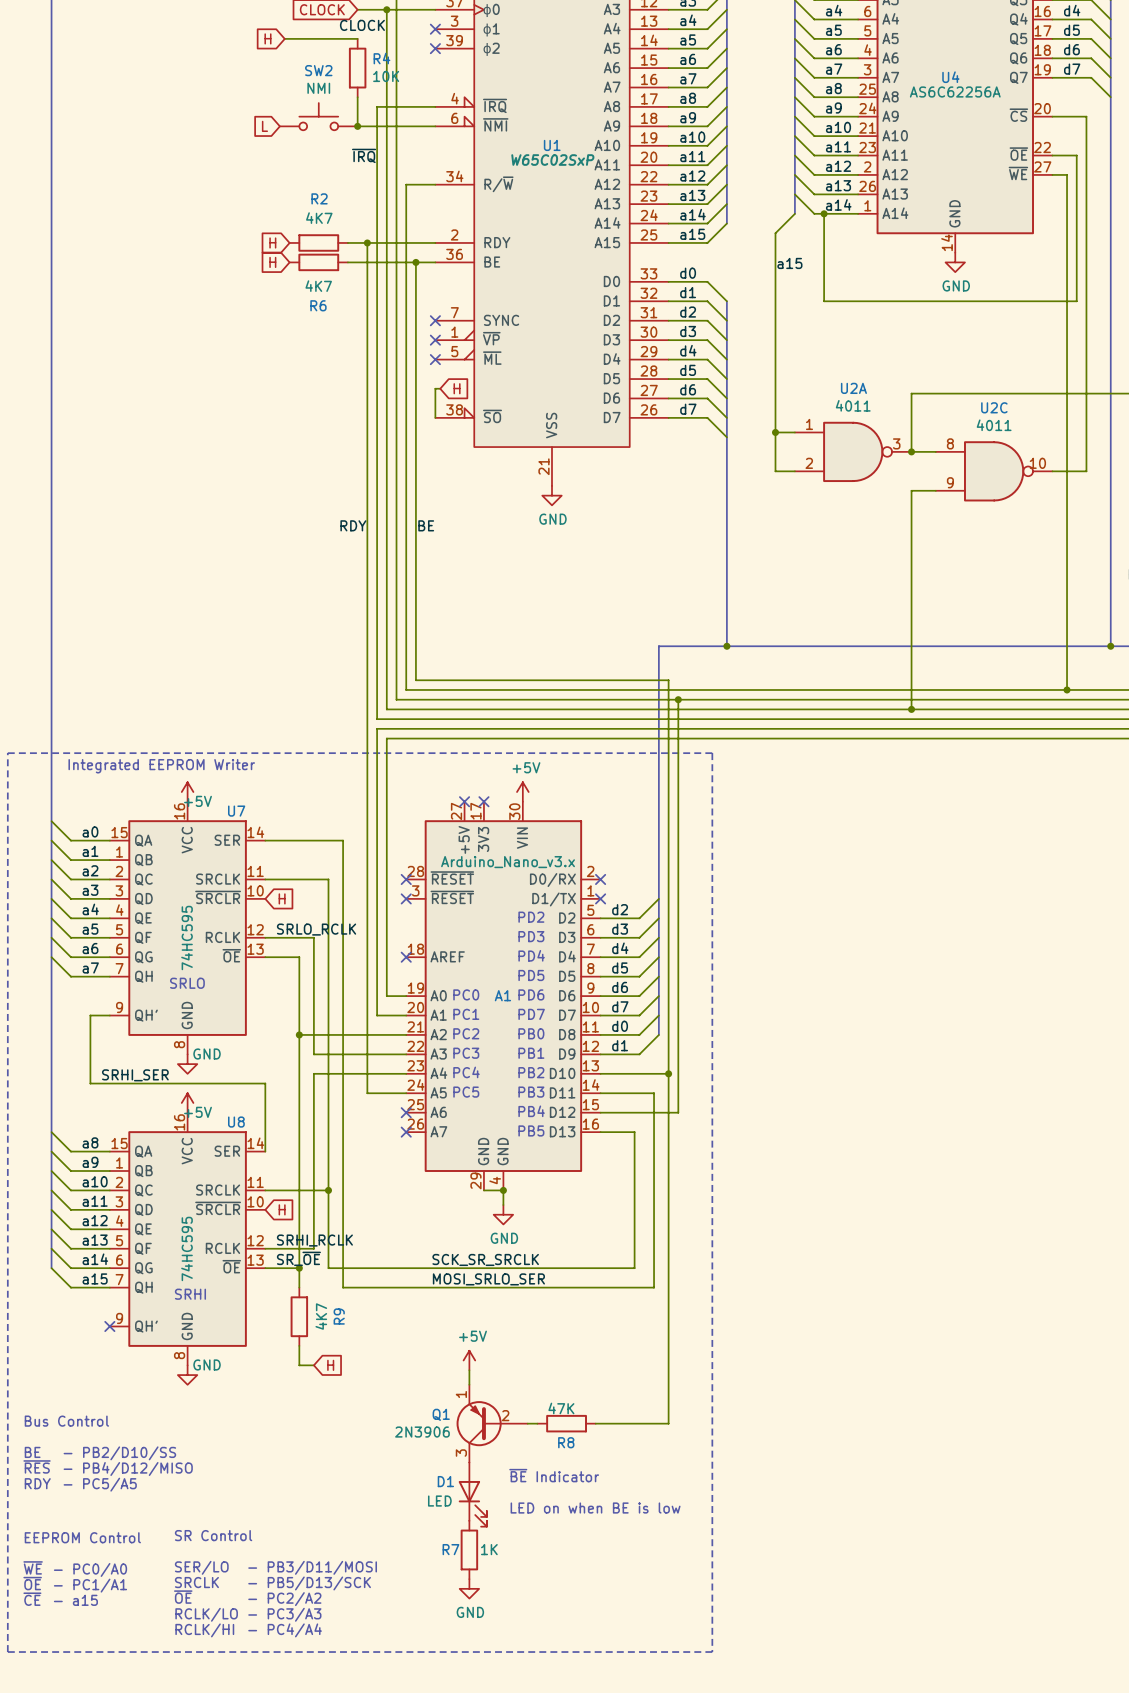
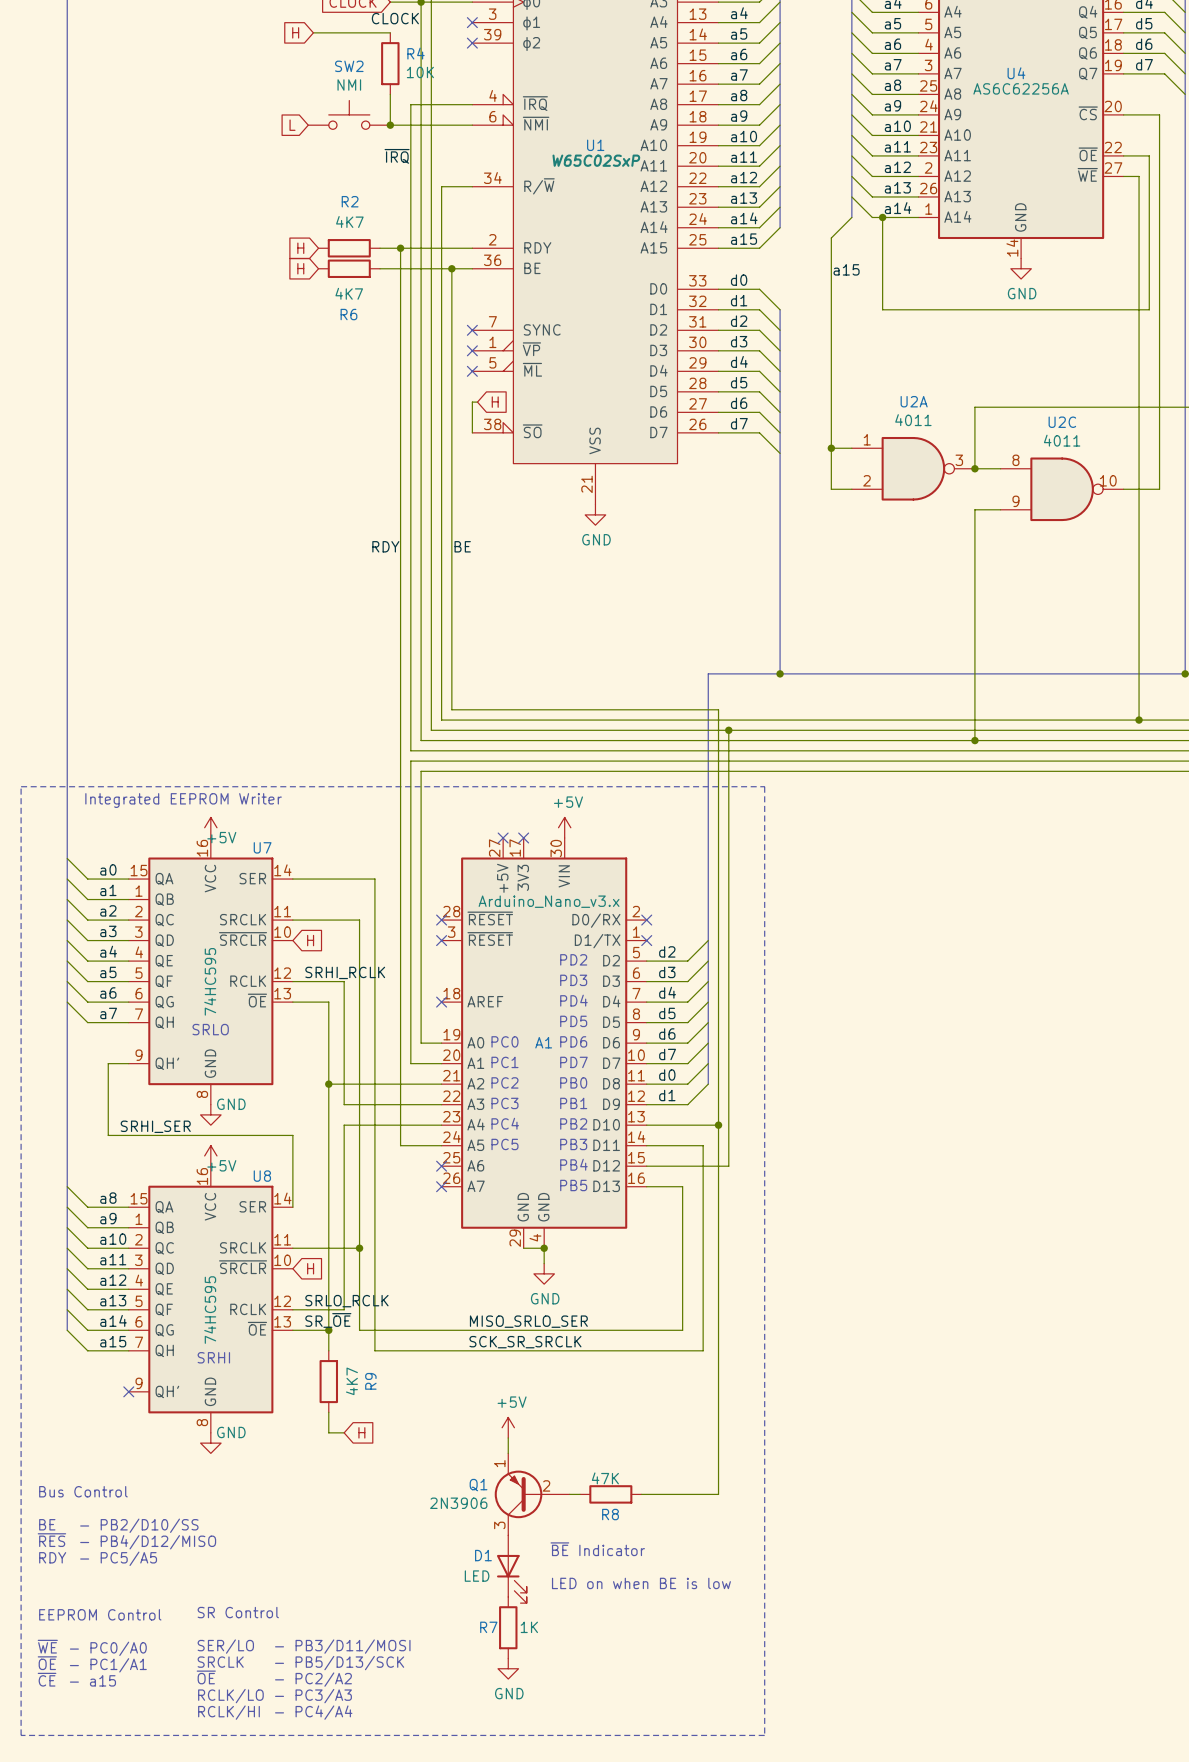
label: SRLO_RCLK (316, 929) -> SRHI_RCLK (345, 972)
label: SRHI_RCLK (314, 1240) -> SRLO_RCLK (346, 1301)
label: SCK_SR_SRCLK (485, 1259) -> MISO_SRLO_SER (528, 1321)
label: MOSI_SRLO_SER (488, 1279) -> SCK_SR_SRCLK (525, 1342)

